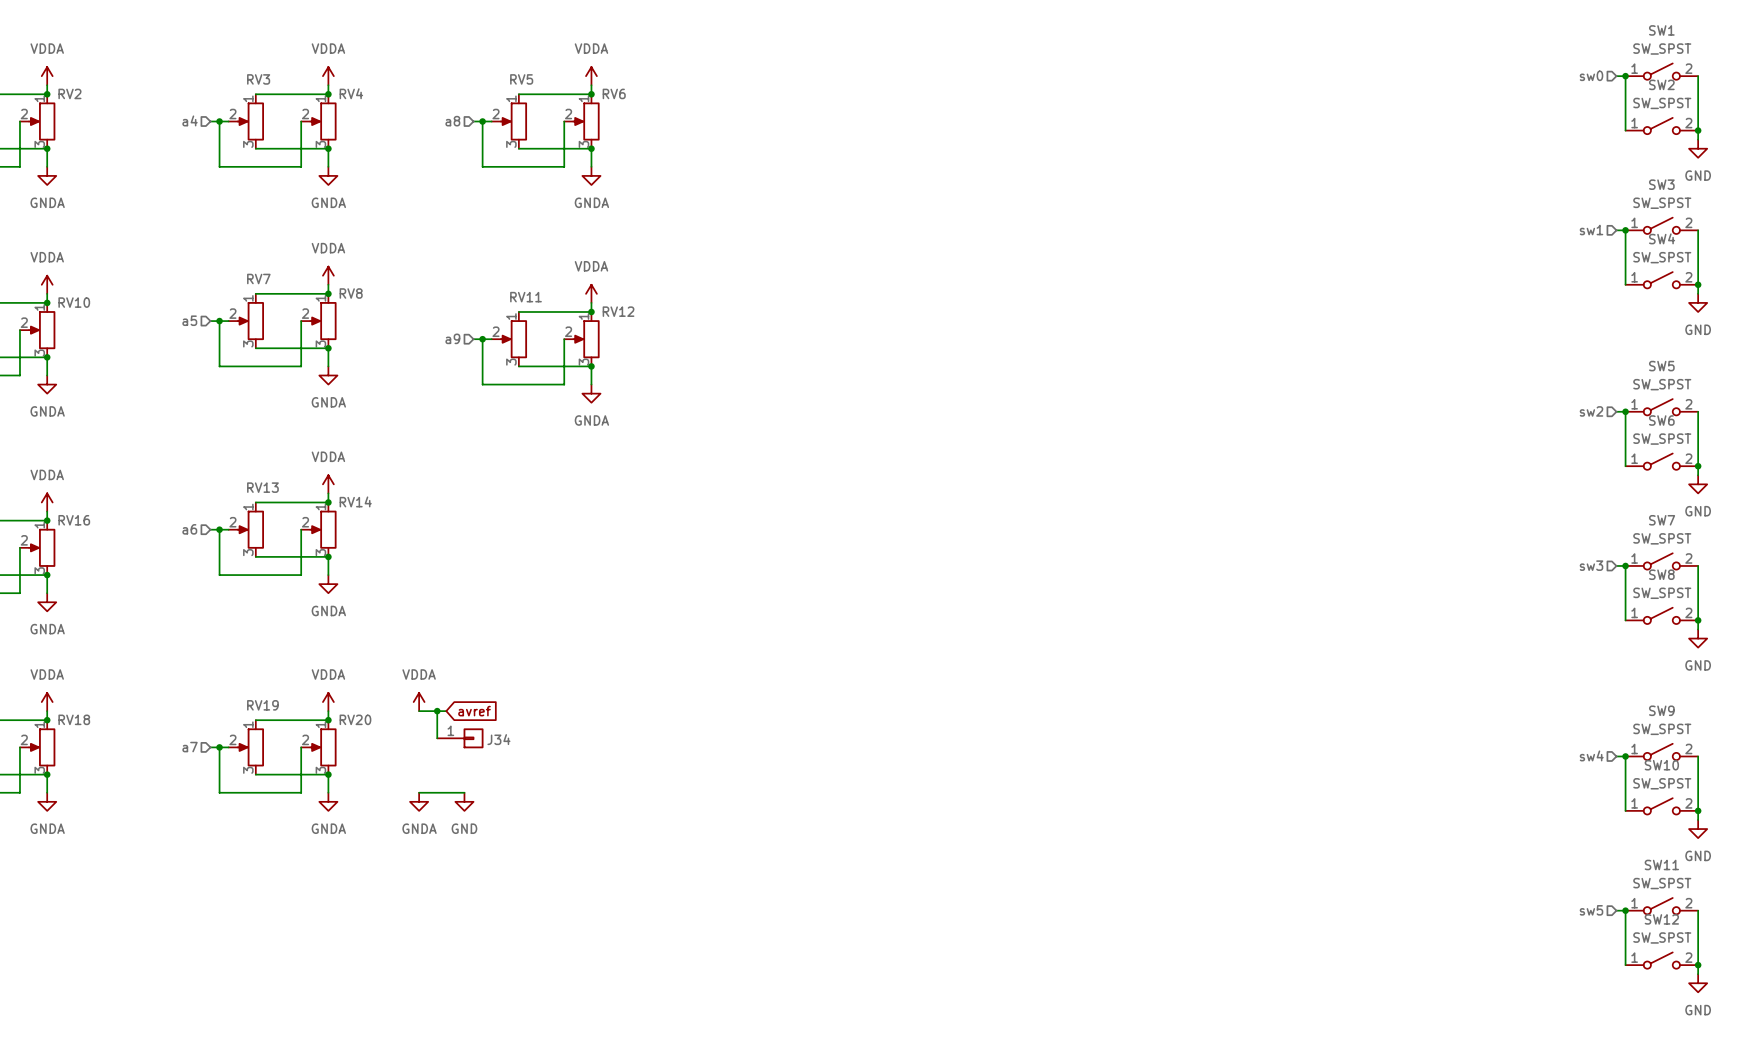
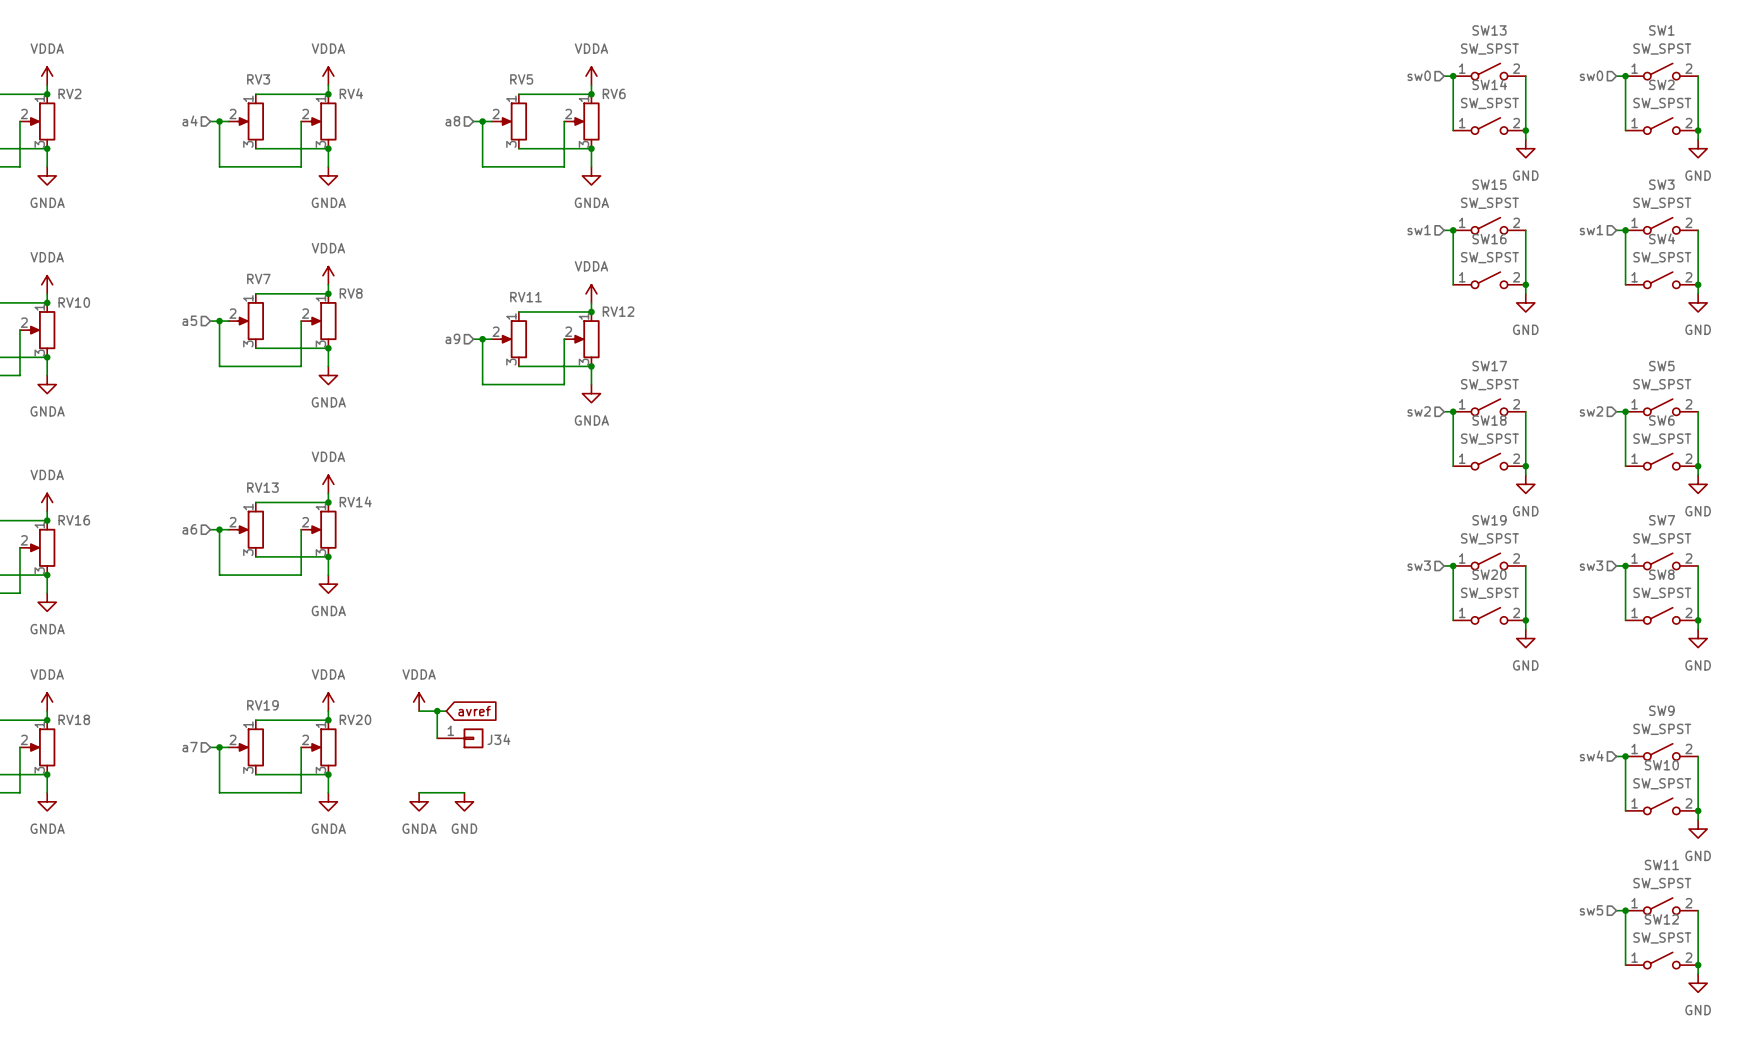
SW13: none -> SW_SPST (1489, 71)
hierarchical label: none -> sw0 (1419, 75)
wire: none -> (1444, 76) (1453, 76) (1453, 130)
junction: none -> (1453, 76)
wire: none -> (1525, 76) (1525, 139)
SW14: none -> SW_SPST (1489, 126)
junction: none -> (1525, 130)
power symbol: none -> GND (1525, 148)
SW15: none -> SW_SPST (1489, 225)
hierarchical label: none -> sw1 (1419, 230)
wire: none -> (1444, 230) (1453, 230) (1453, 284)
junction: none -> (1453, 230)
wire: none -> (1525, 230) (1525, 293)
SW16: none -> SW_SPST (1489, 280)
junction: none -> (1525, 284)
power symbol: none -> GND (1525, 302)
SW17: none -> SW_SPST (1489, 407)
hierarchical label: none -> sw2 (1419, 411)
wire: none -> (1444, 411) (1453, 411) (1453, 466)
junction: none -> (1453, 411)
wire: none -> (1525, 411) (1525, 475)
SW18: none -> SW_SPST (1489, 461)
junction: none -> (1525, 466)
power symbol: none -> GND (1525, 484)
SW19: none -> SW_SPST (1489, 561)
hierarchical label: none -> sw3 (1419, 565)
wire: none -> (1444, 565) (1453, 565) (1453, 620)
junction: none -> (1453, 565)
wire: none -> (1525, 565) (1525, 629)
SW20: none -> SW_SPST (1489, 615)
junction: none -> (1525, 620)
power symbol: none -> GND (1525, 638)

